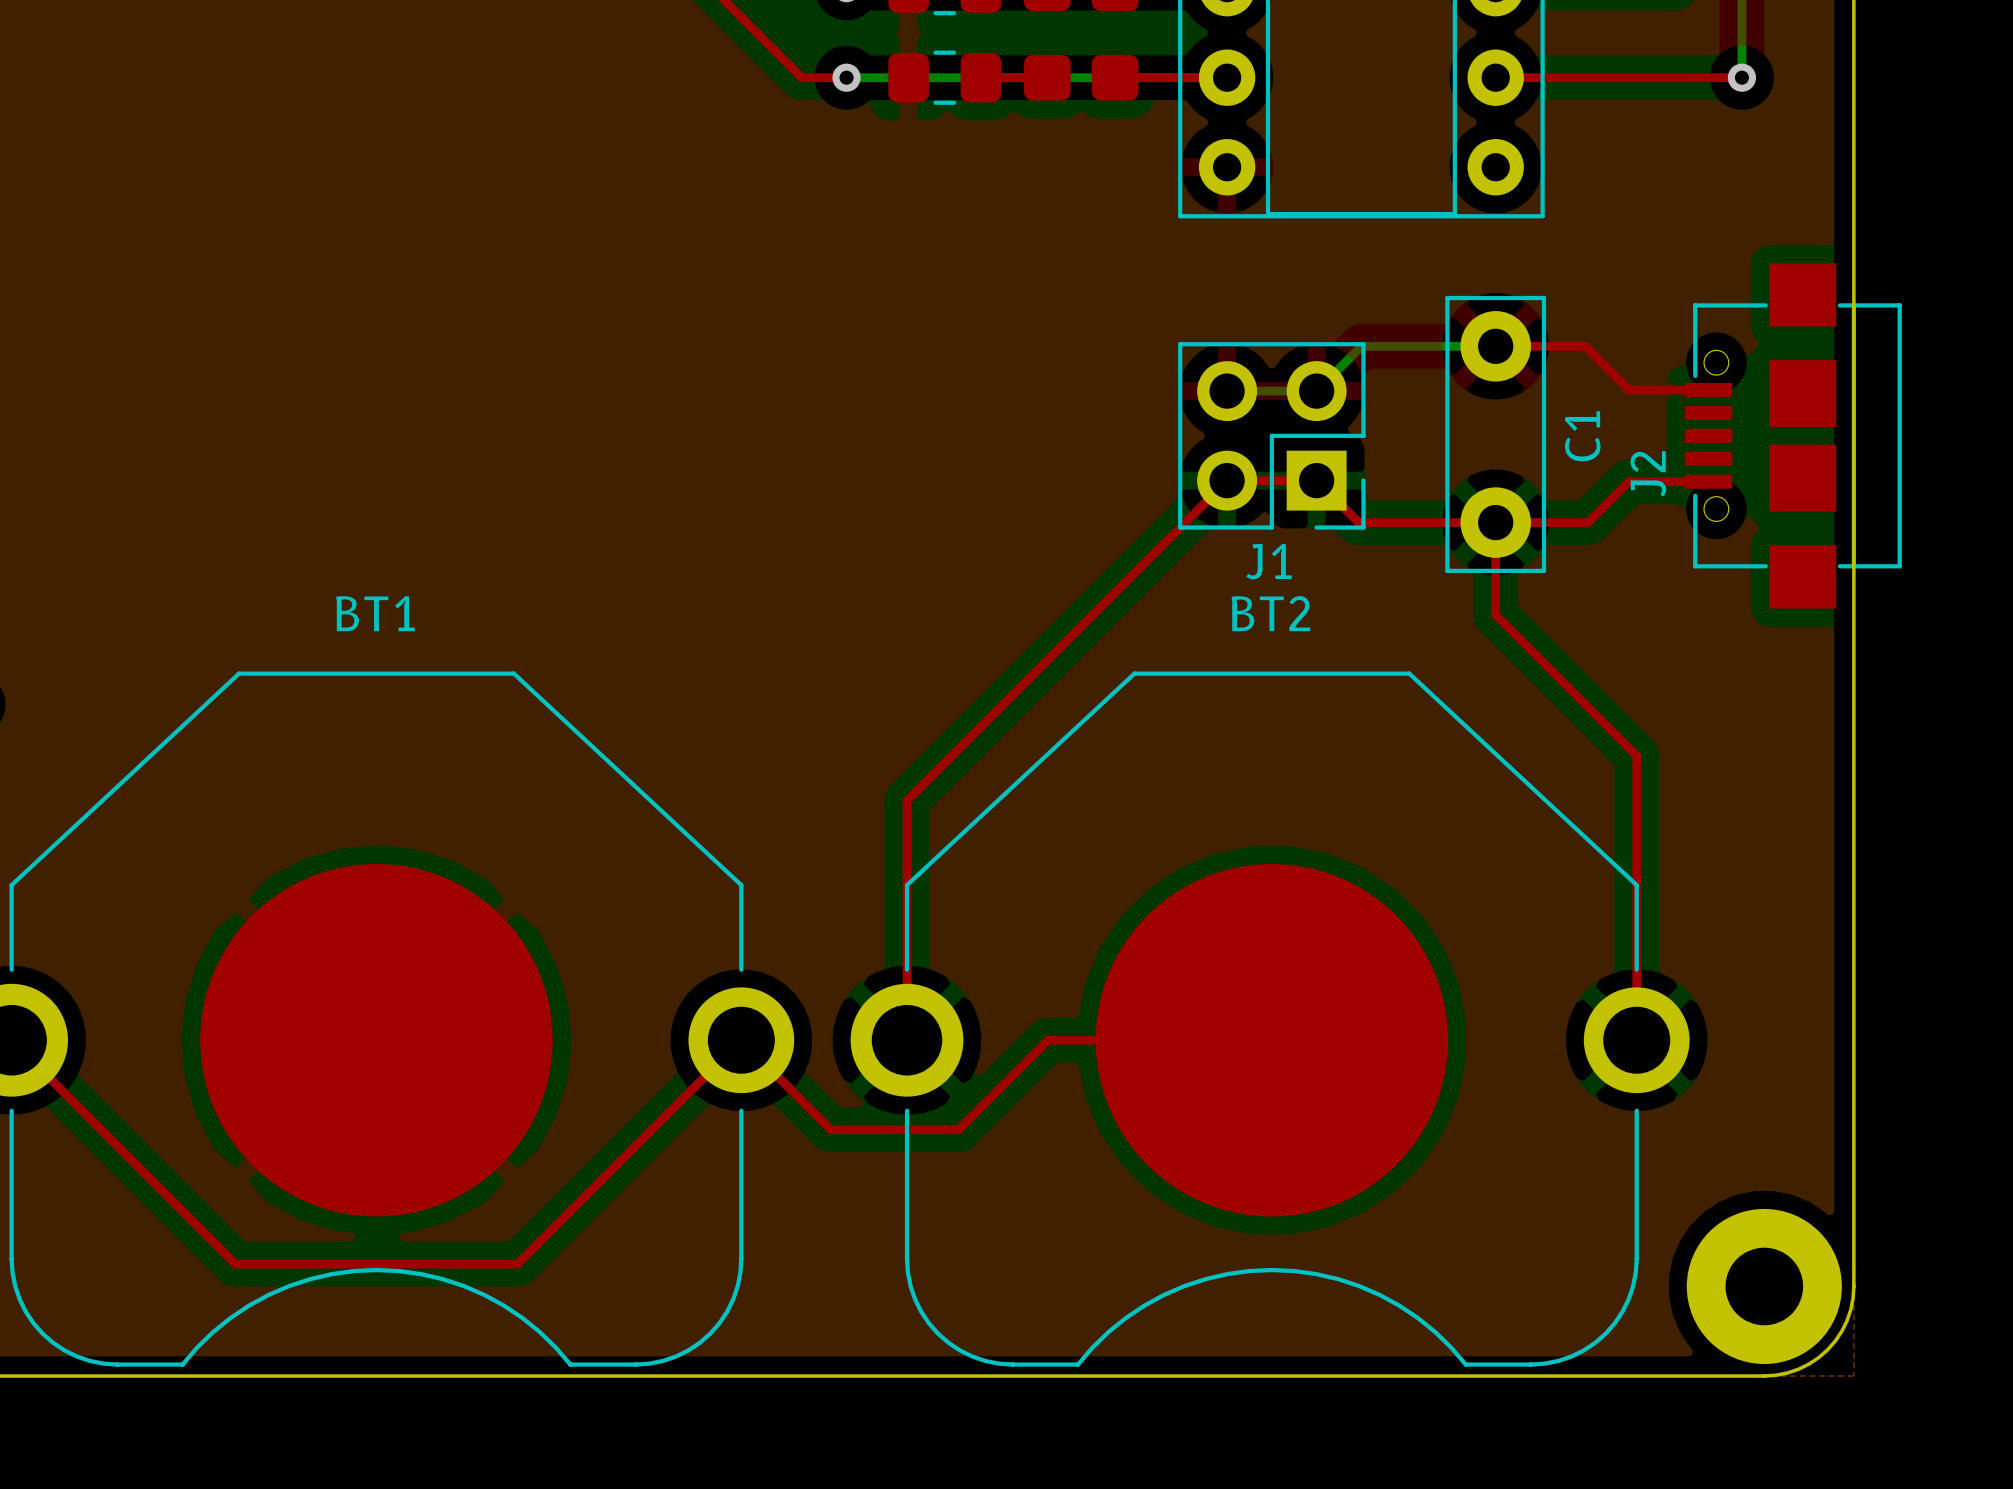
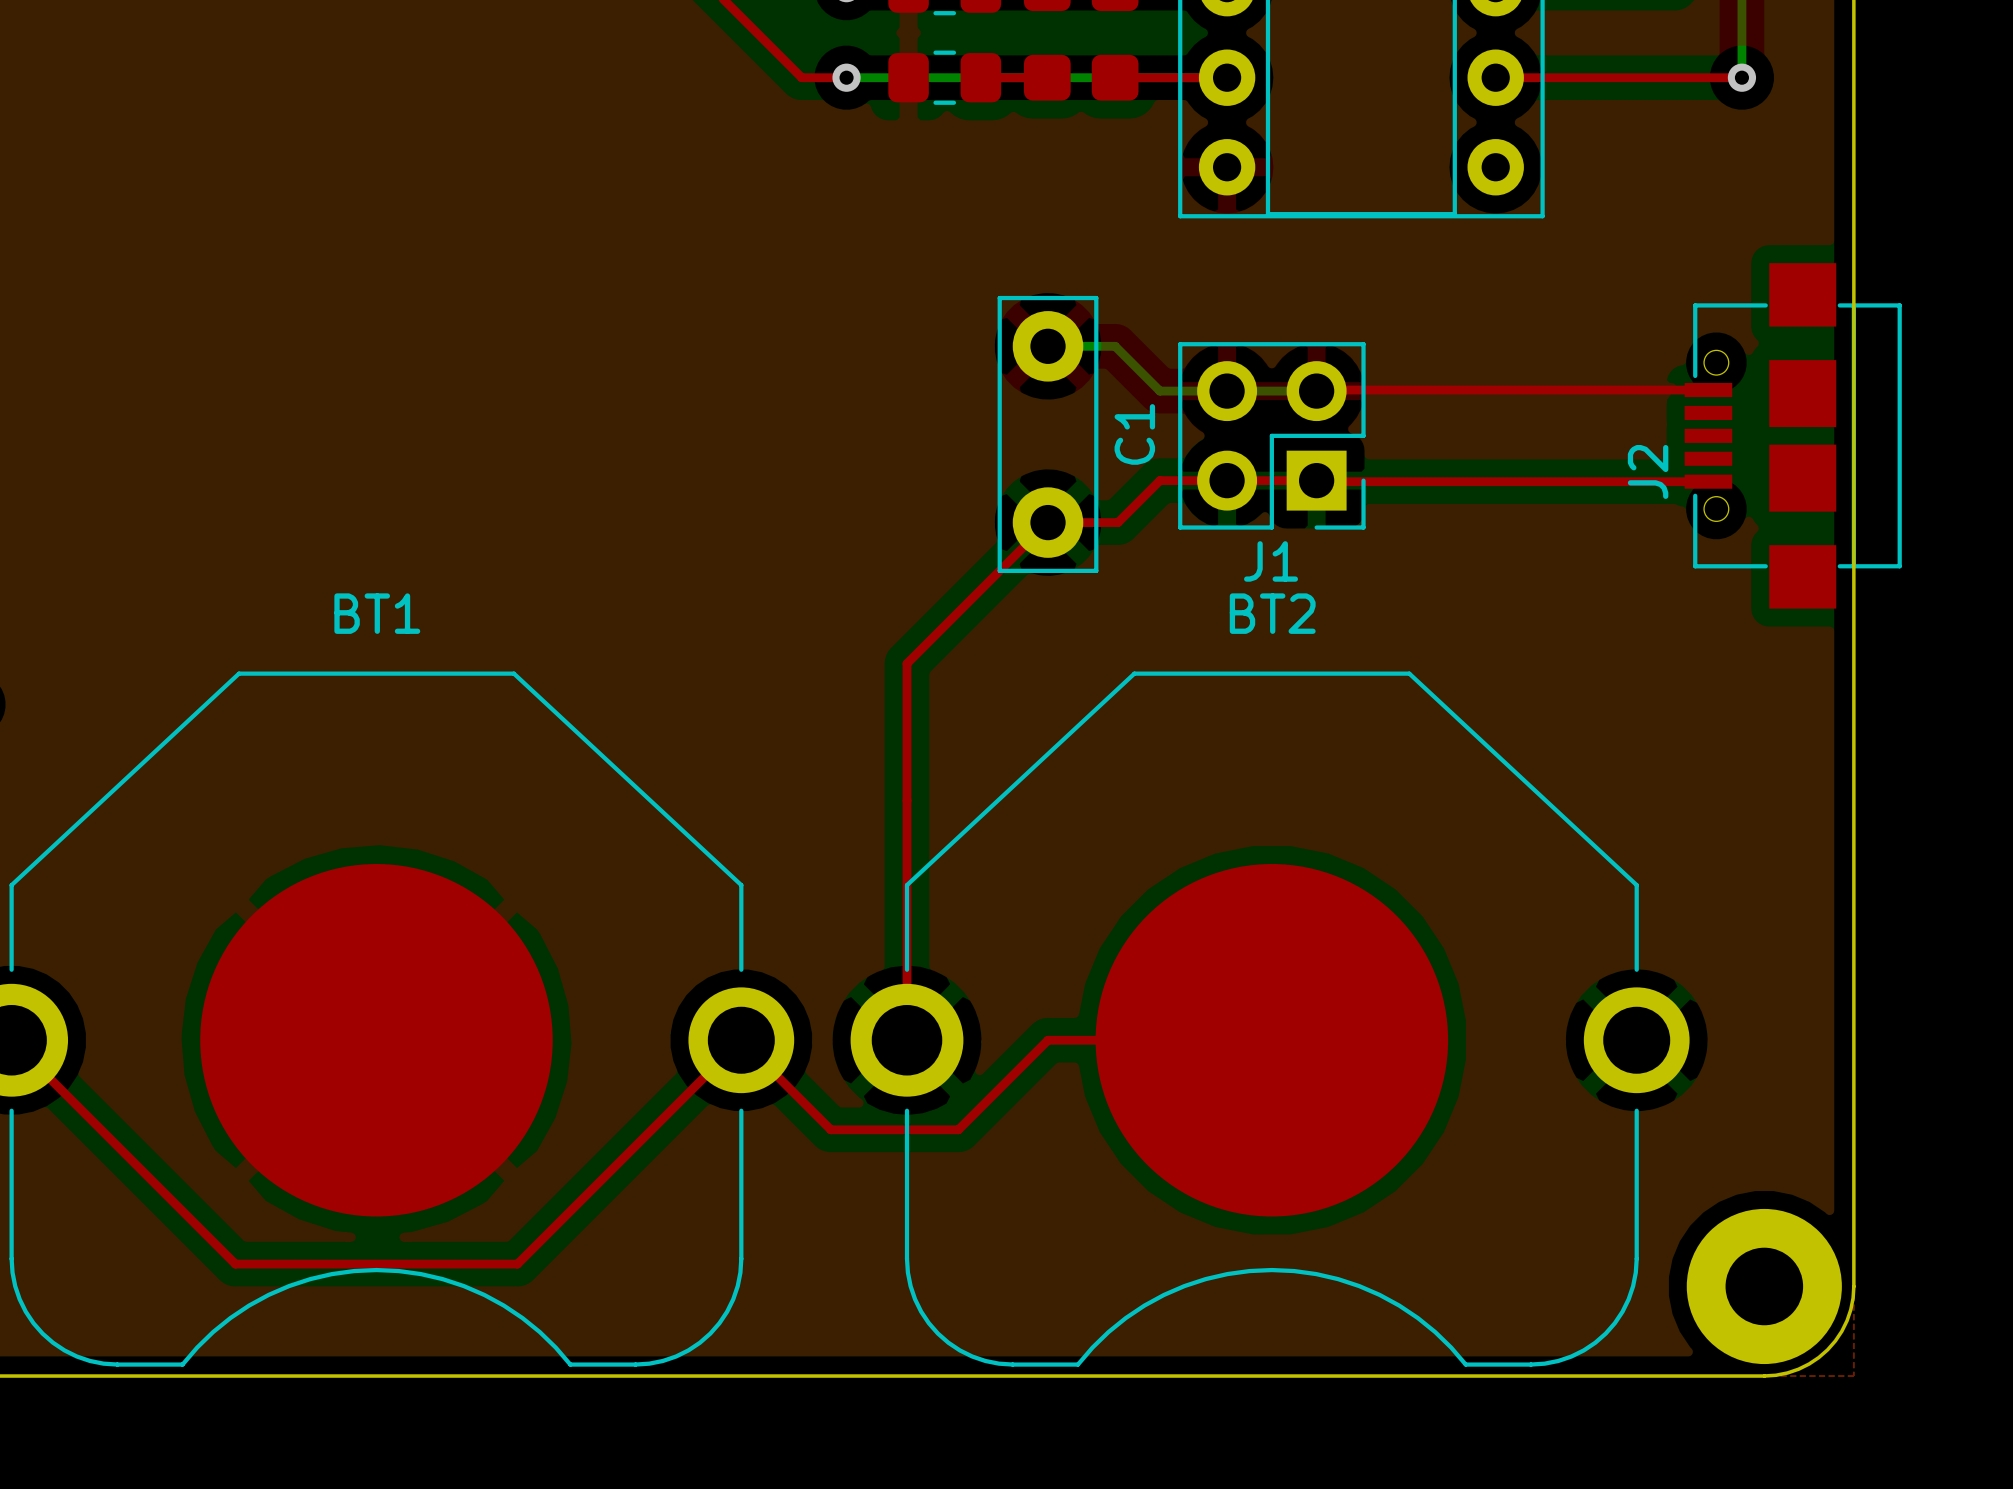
bottom track: none -> (1048, 346) (1115, 346) (1159, 391) (1227, 391)
top track: (1495, 346) (1585, 346) (1628, 390) -> (1316, 391) (1628, 390)
bottom track: (1495, 346) (1361, 346) (1316, 391) -> none
C1 position: (1495, 434) -> (1048, 434)
top track: (1227, 480) (907, 800) -> (1227, 480) (1159, 480) (1117, 522) (1048, 522) (907, 663) (907, 800)
top track: (1317, 481) (1358, 522) (1588, 522) (1628, 481) -> (1317, 481) (1628, 481)
top track: (1495, 522) (1495, 614) (1636, 755) (1636, 1040) -> none

